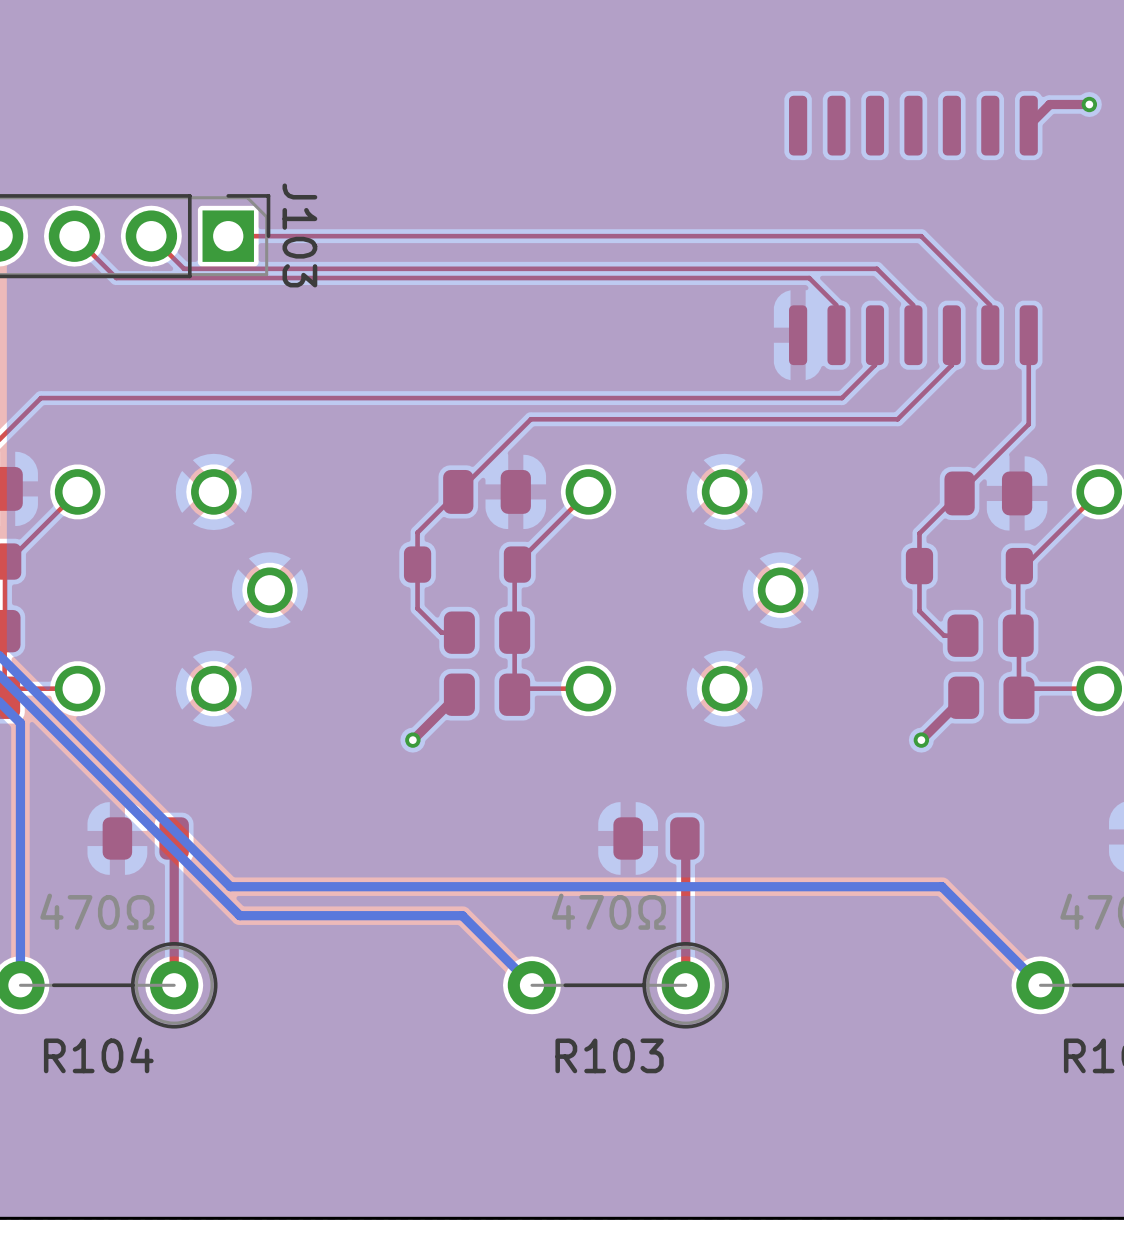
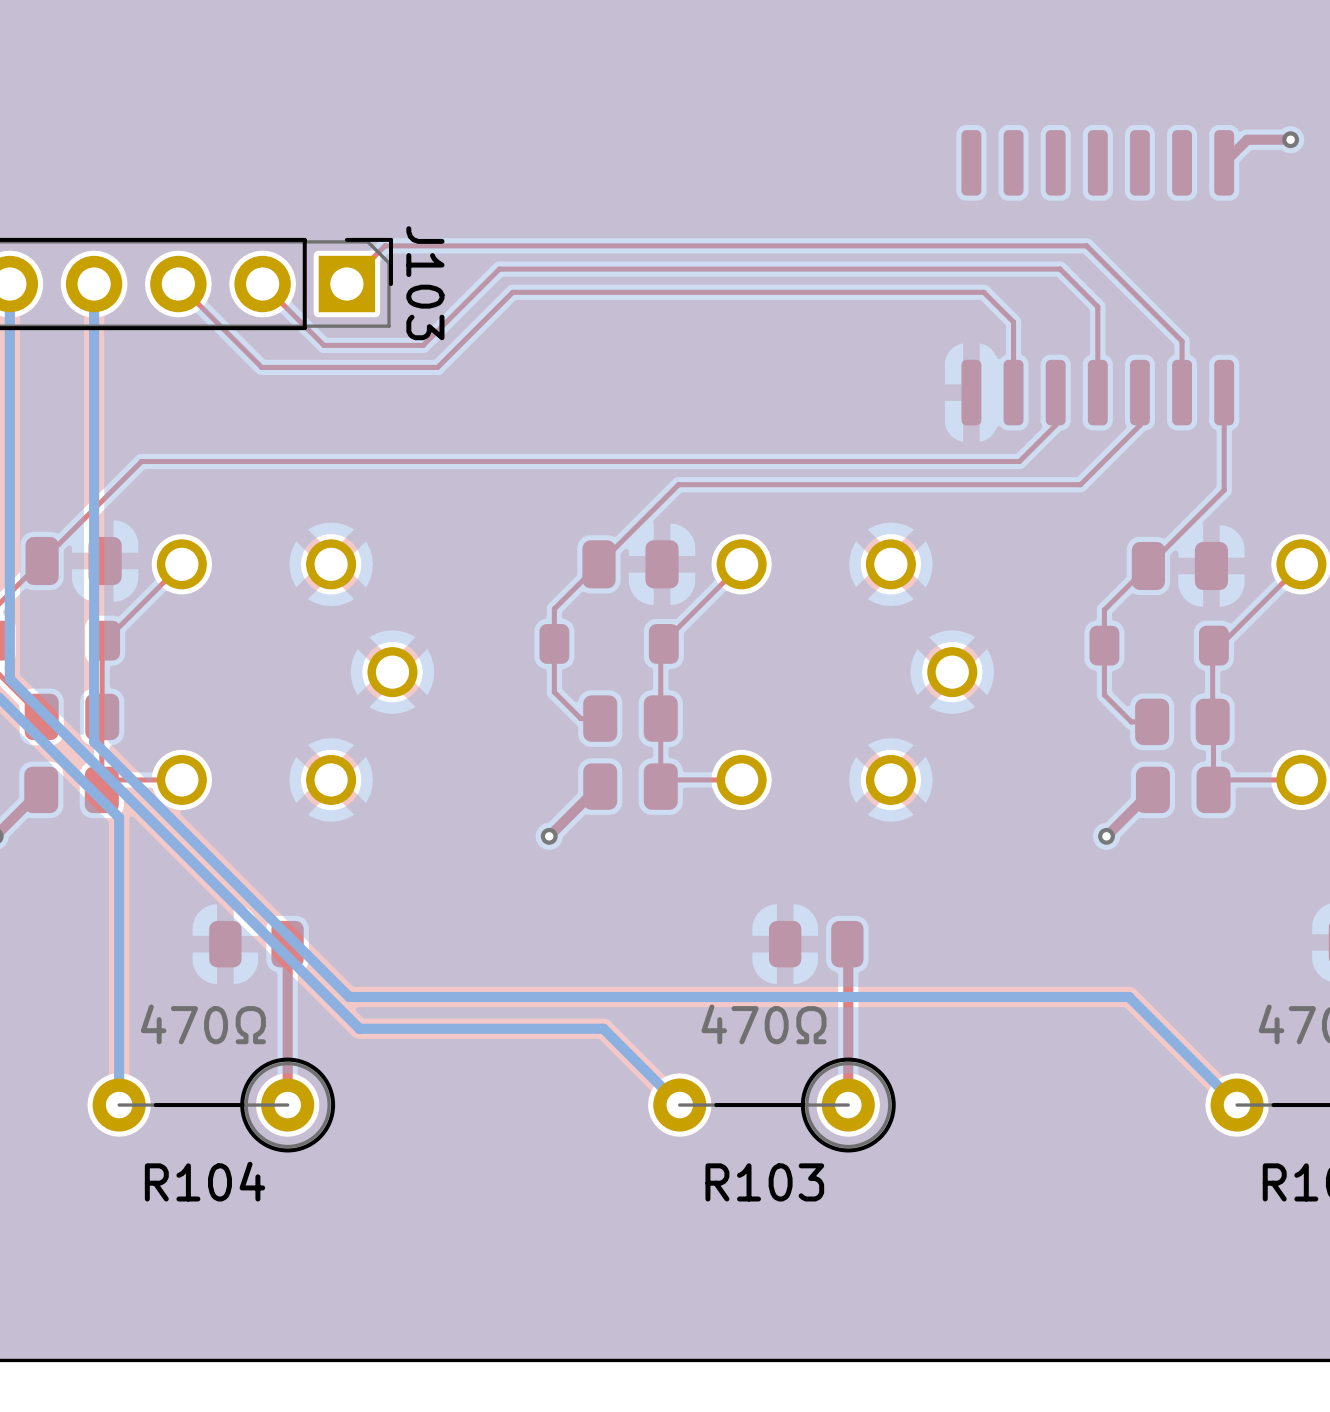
top track: (228, 236) (921, 236) (990, 305) -> (346, 284) (385, 245) (1086, 245) (1182, 341) (1182, 392)
top track: (184, 268) (876, 268) (913, 305) -> (298, 319) (323, 345) (423, 345) (499, 269) (1060, 269) (1097, 306) (1097, 392)
top track: (116, 278) (809, 278) (836, 305) -> (224, 329) (261, 367) (437, 367) (512, 292) (983, 292) (1013, 322) (1013, 392)

